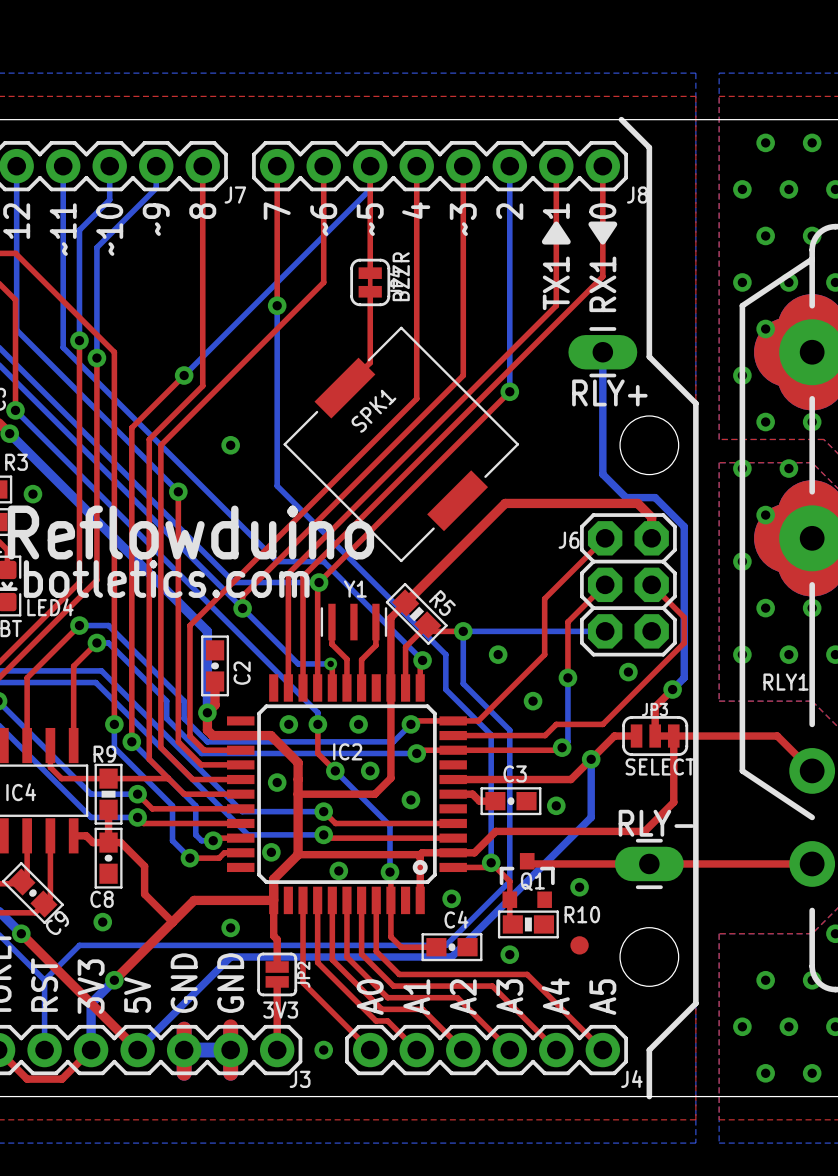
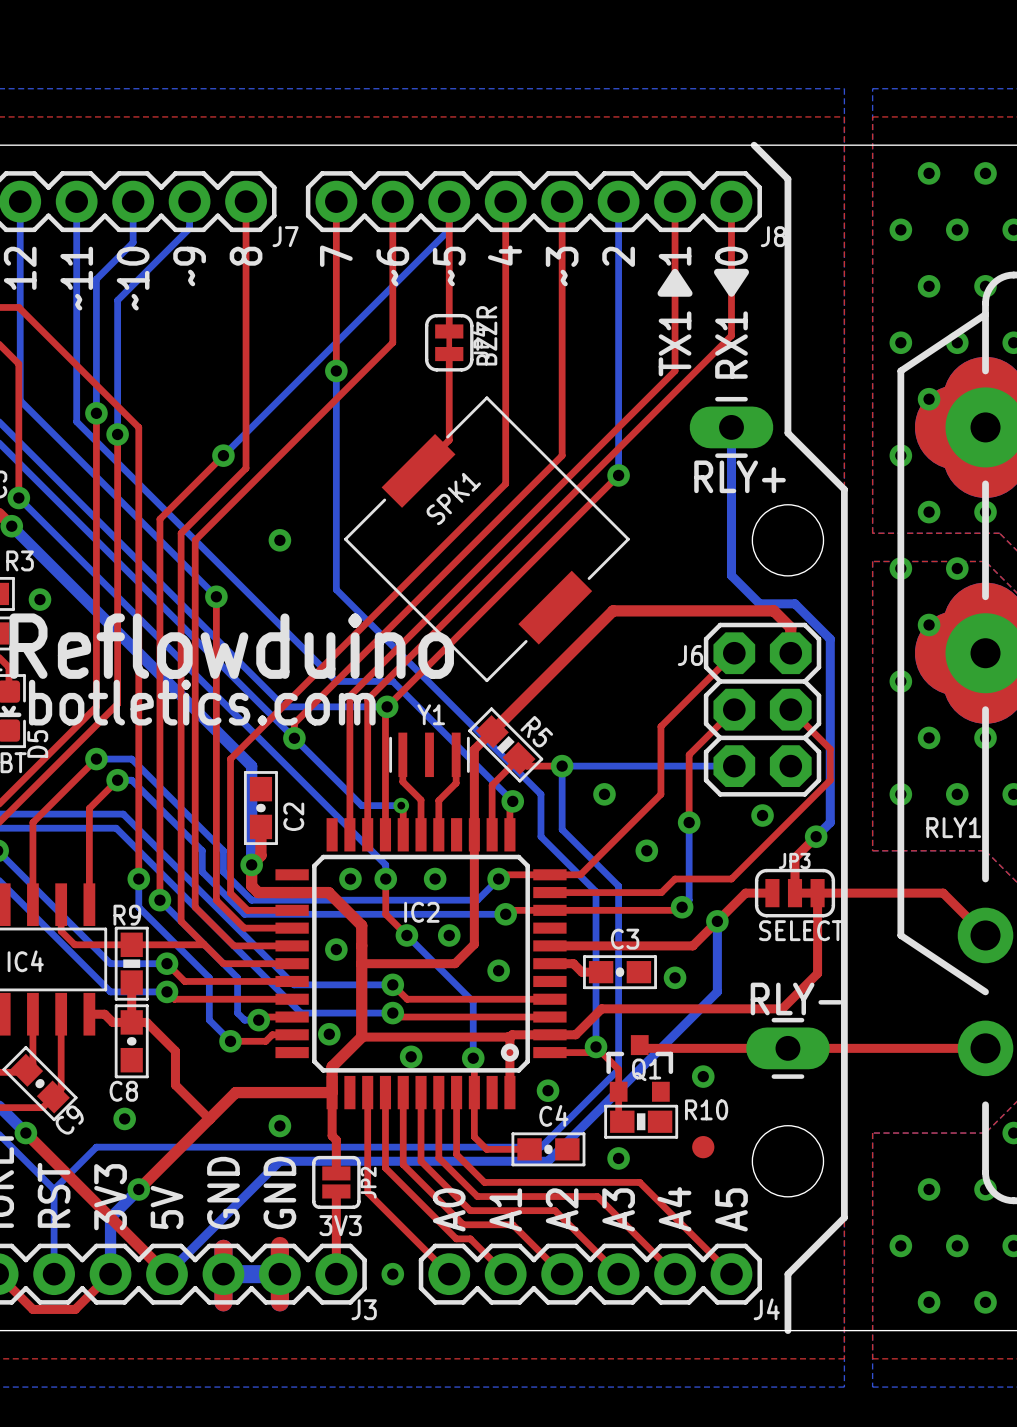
LED4 name: LED4 (50, 607) -> D5 (37, 743)

